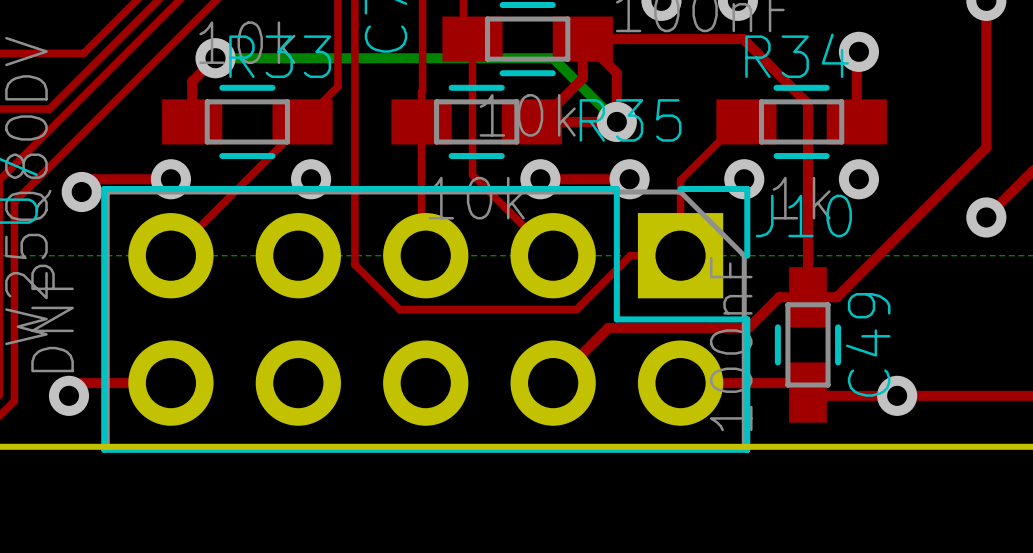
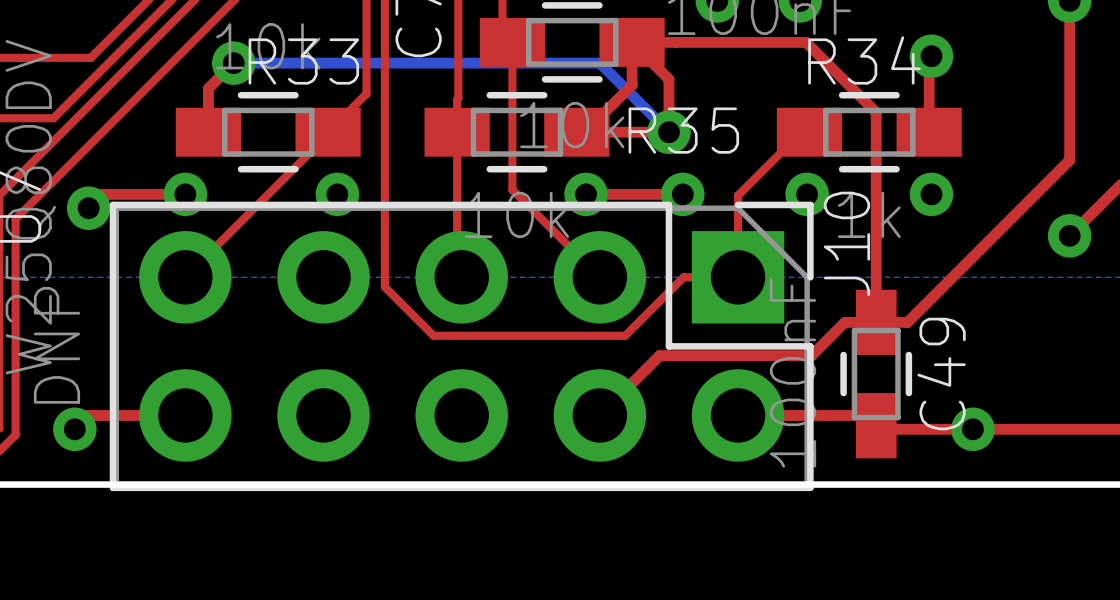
J10 name rotation: 0° (803, 215) -> 90° counterclockwise (846, 243)

